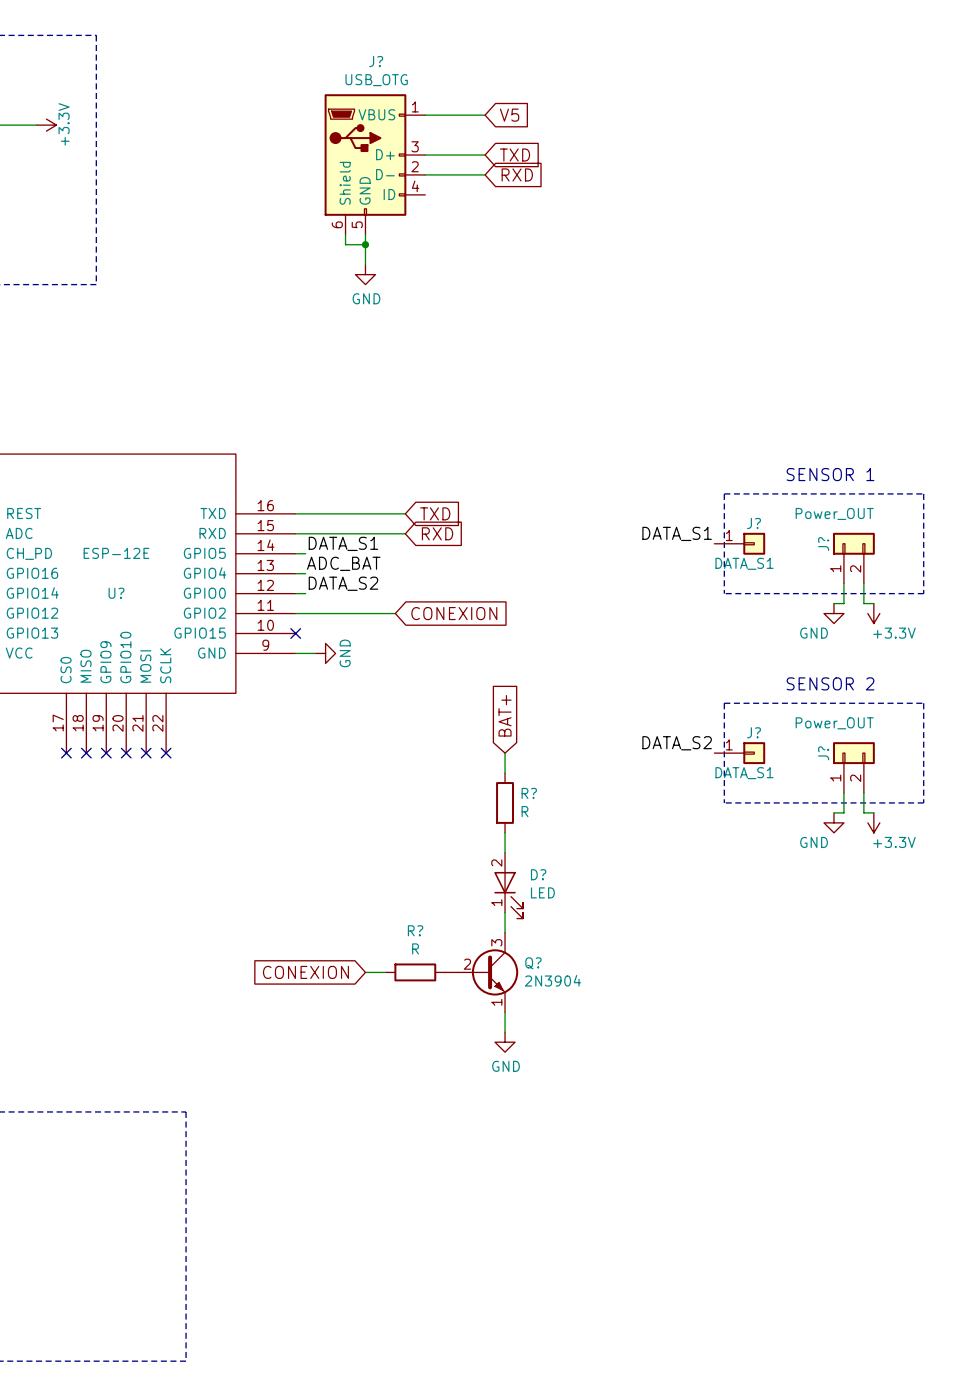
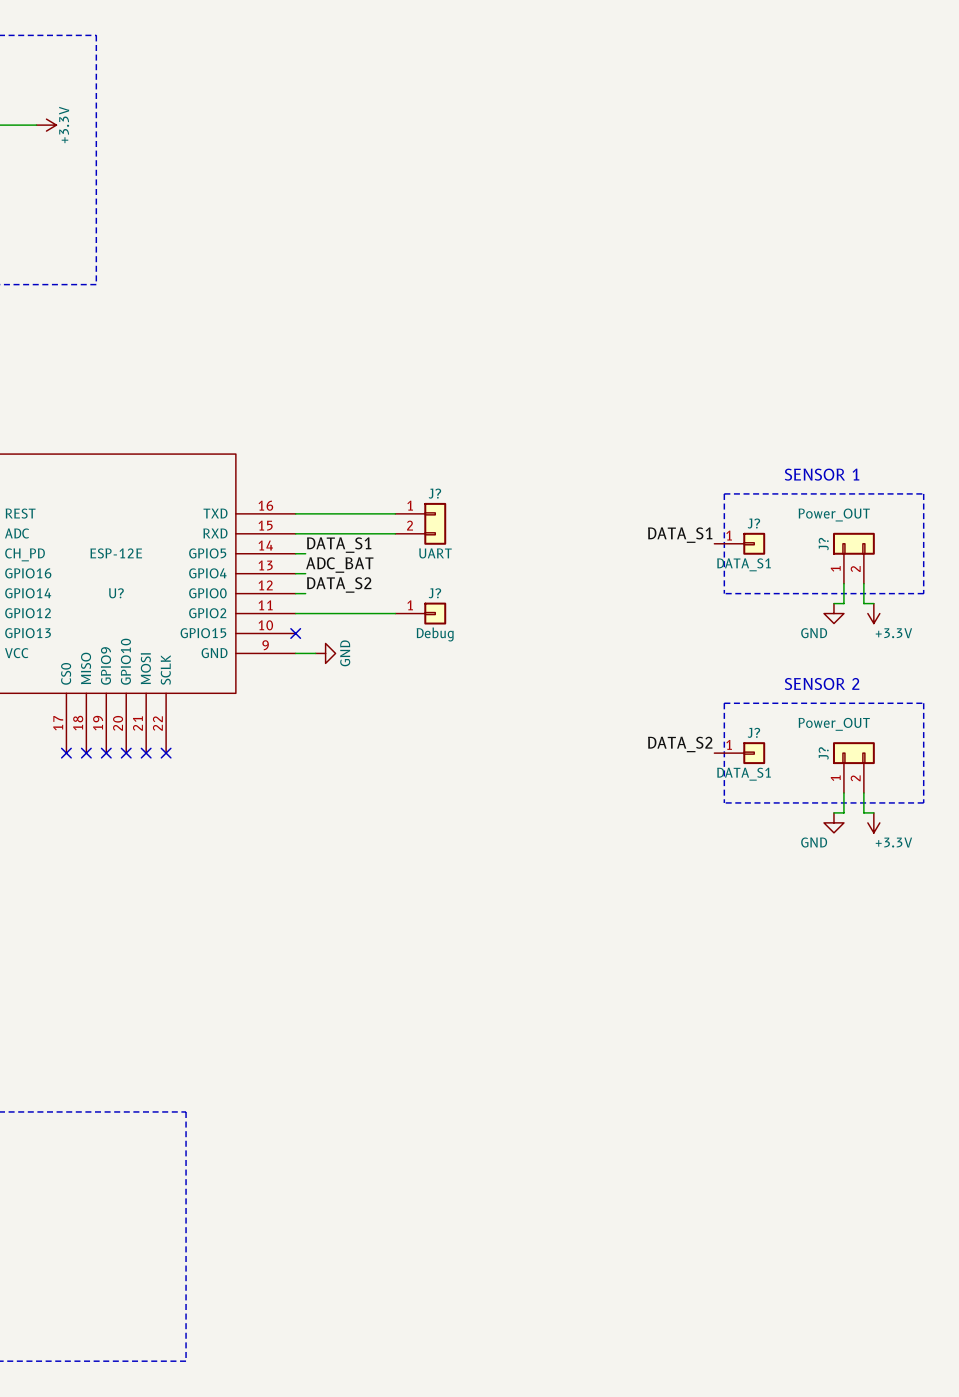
wire: (425, 115) (485, 115) -> none
global label: V5 (509, 115) -> none
wire: (425, 155) (485, 155) -> none
global label: TXD (514, 155) -> none
J?: USB_OTG (374, 164) -> none
wire: (425, 174) (485, 174) -> none
global label: RXD (517, 174) -> none
wire: (345, 234) (345, 244) (365, 244) -> none
wire: (365, 234) (365, 264) -> none
junction: (365, 244) -> none
power symbol: GND (365, 274) -> none
global label: TXD (435, 513) -> none
J?: none -> UART (420, 523)
global label: RXD (437, 533) -> none
J?: none -> Debug (420, 613)
global label: CONEXION (454, 613) -> none
global label: BAT+ (505, 715) -> none
wire: (505, 753) (505, 773) -> none
R?: R (505, 802) -> none
wire: (505, 832) (505, 852) -> none
D?: LED (508, 885) -> none
wire: (505, 912) (505, 932) -> none
global label: CONEXION (305, 972) -> none
wire: (365, 972) (385, 972) -> none
R?: R (415, 972) -> none
Q?: 2N3904 (481, 972) -> none
wire: (505, 1012) (505, 1032) -> none
power symbol: GND (505, 1042) -> none

